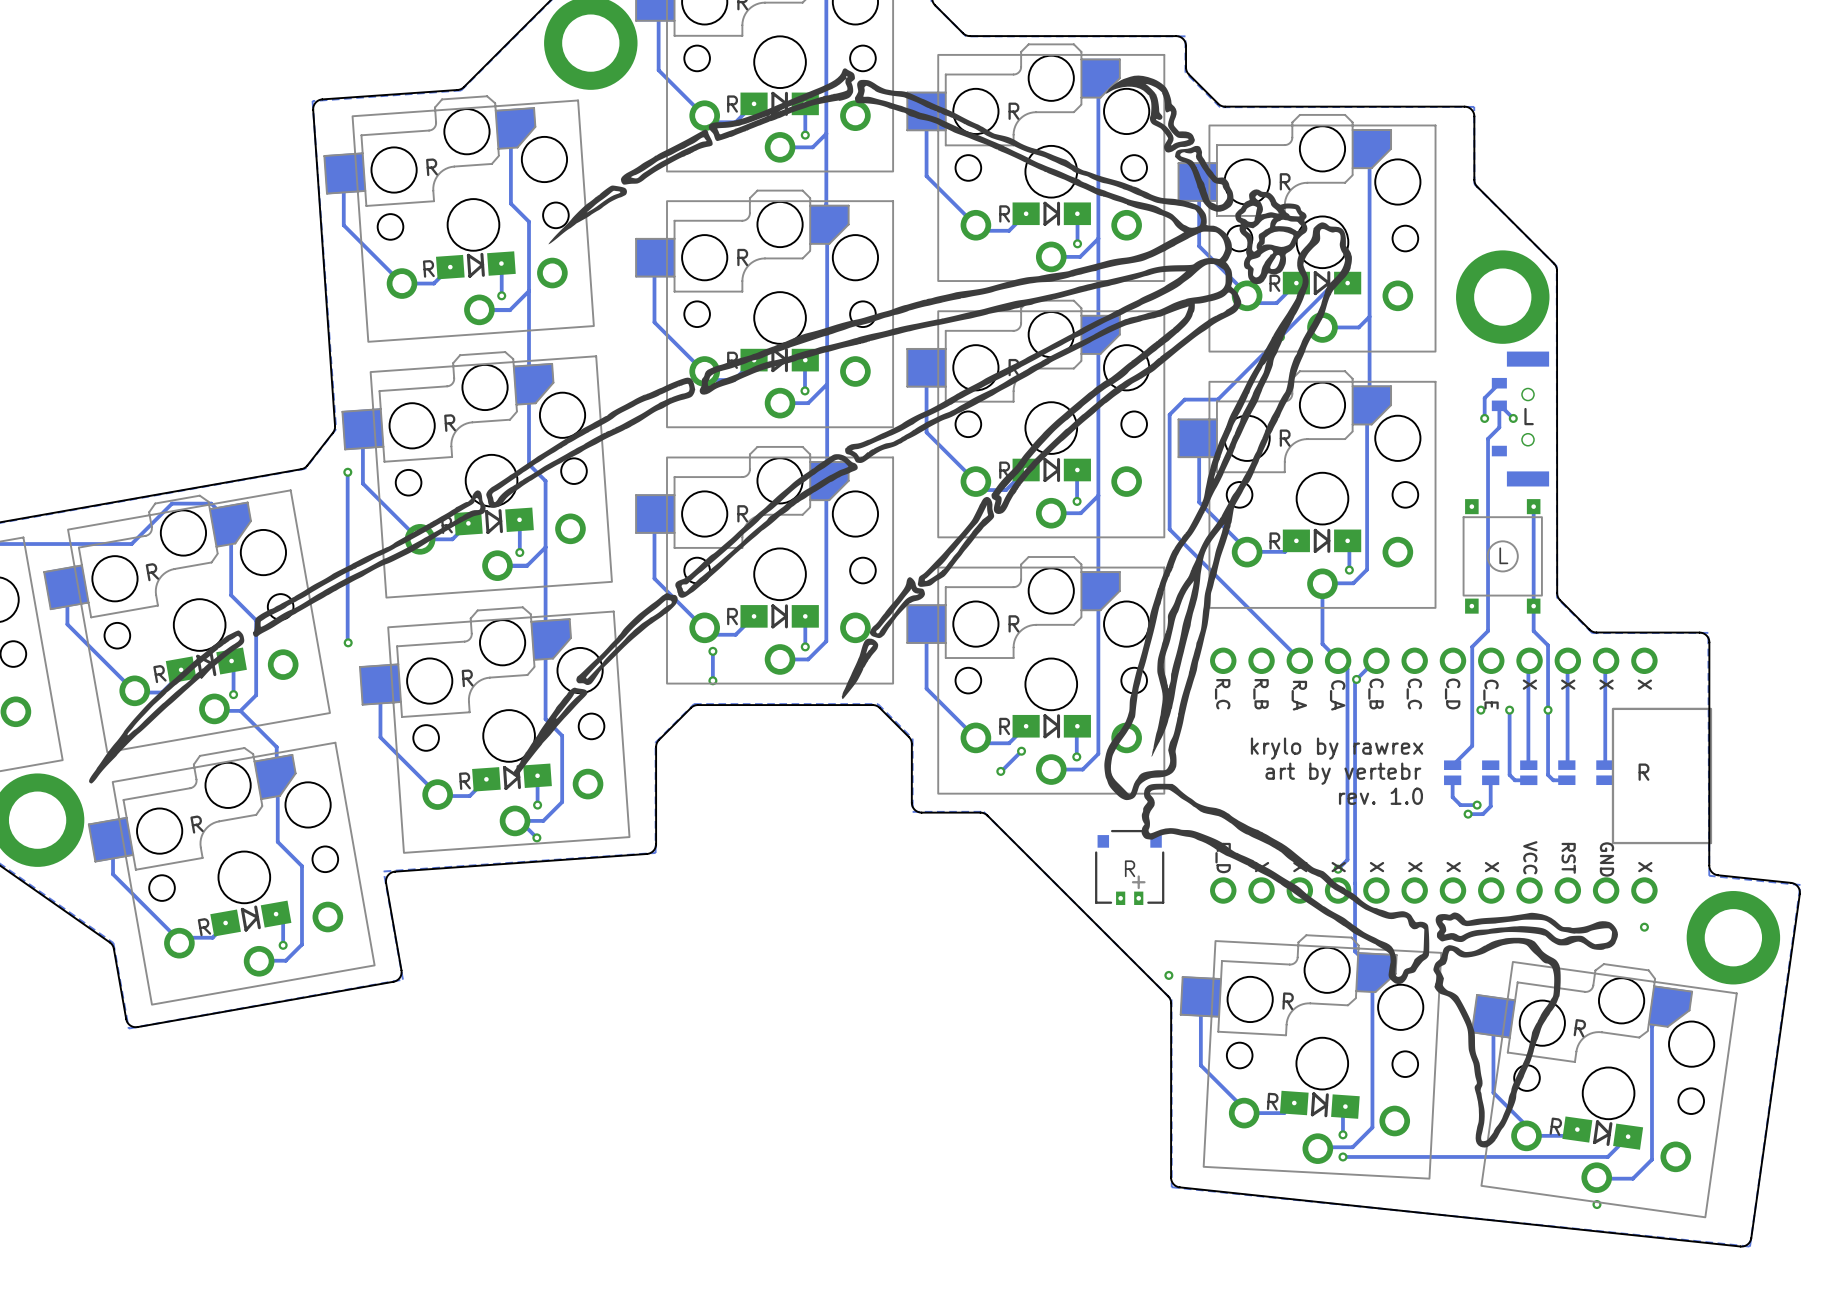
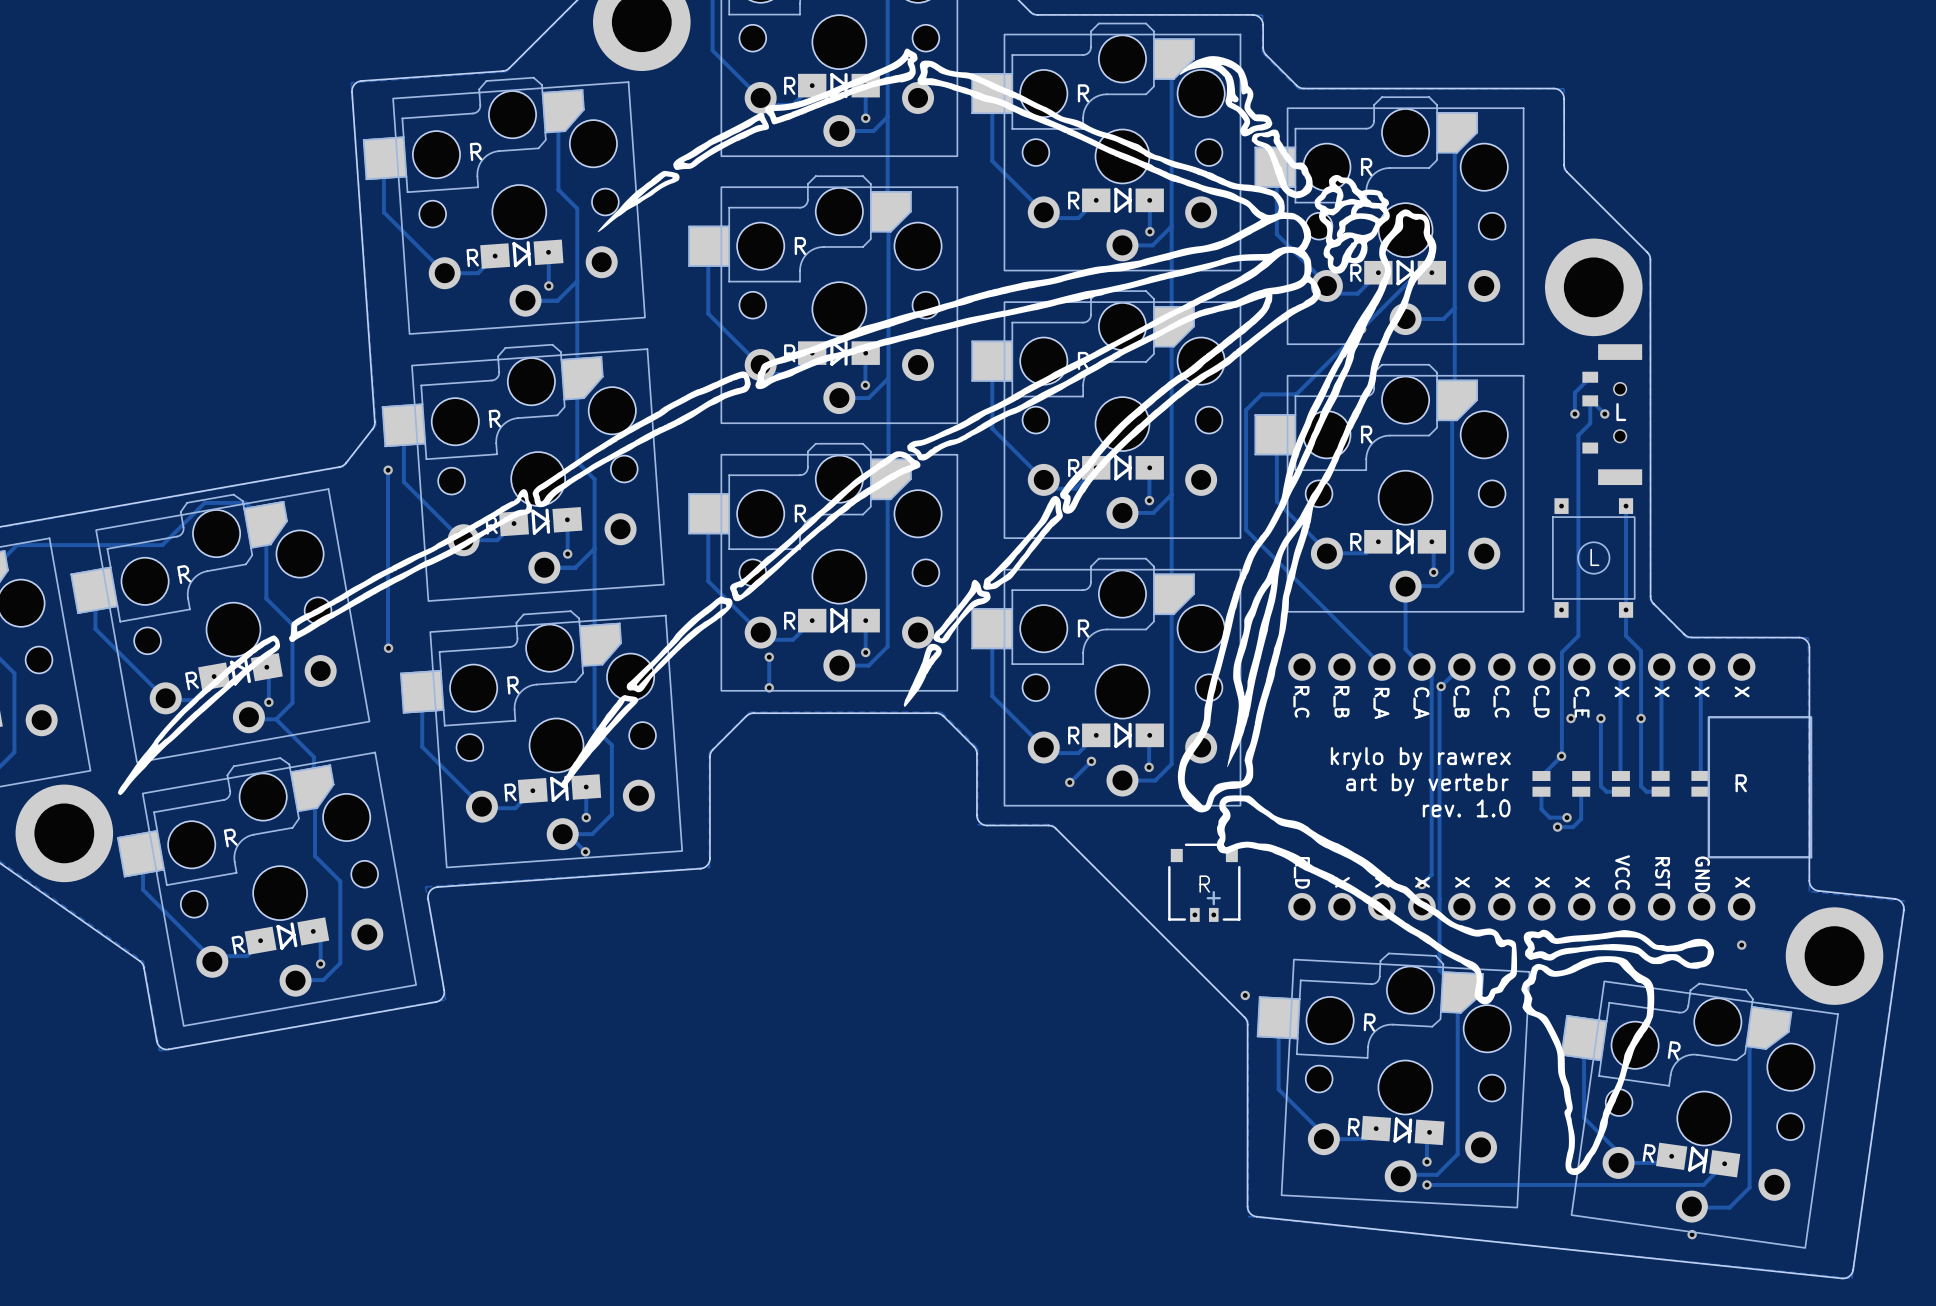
via: none -> (1561, 756)

